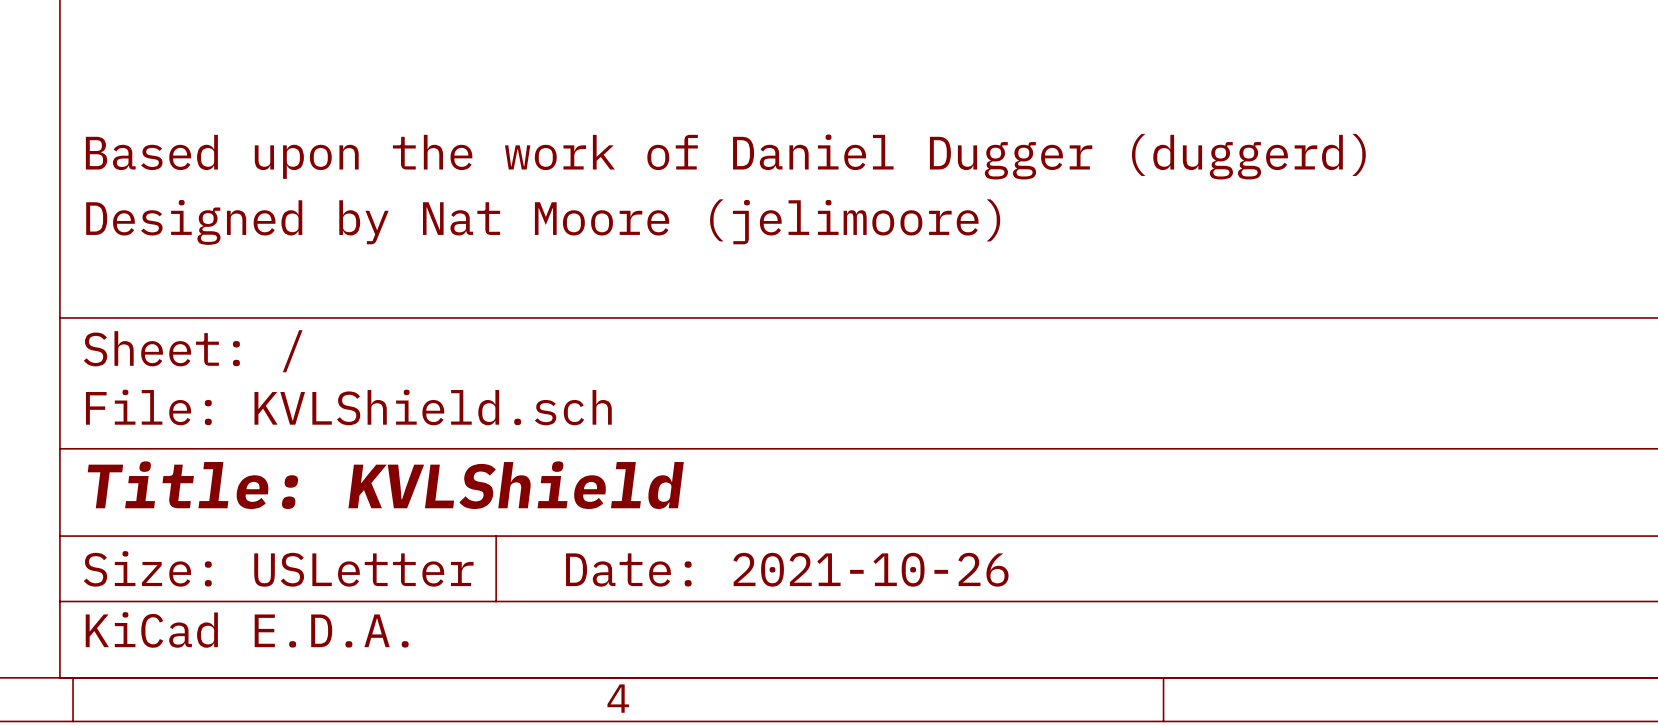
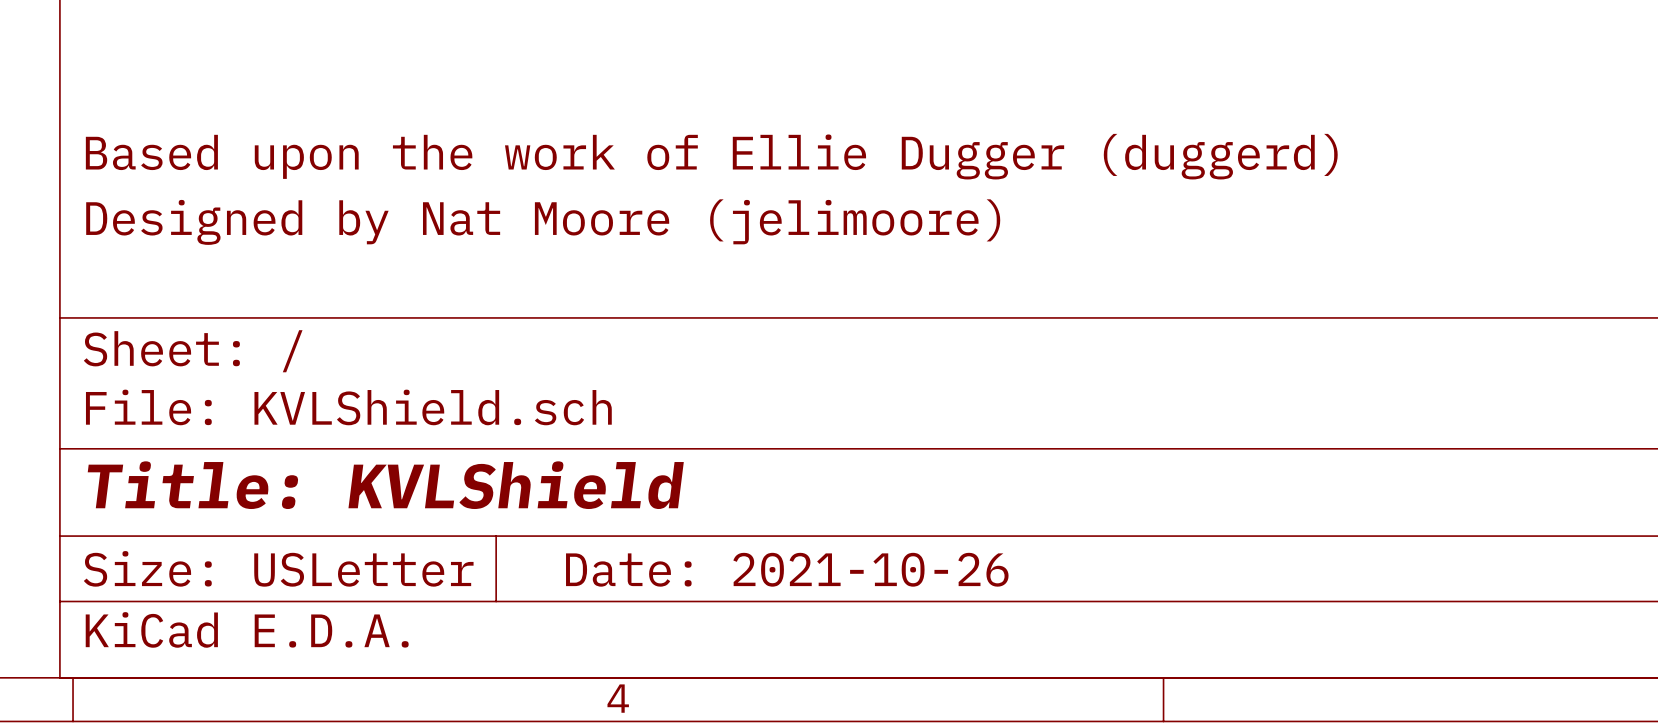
title block: Based upon the work of Daniel Dugger (duggerd) (725, 156) -> Based upon the work of Ellie Dugger (duggerd) (711, 156)

